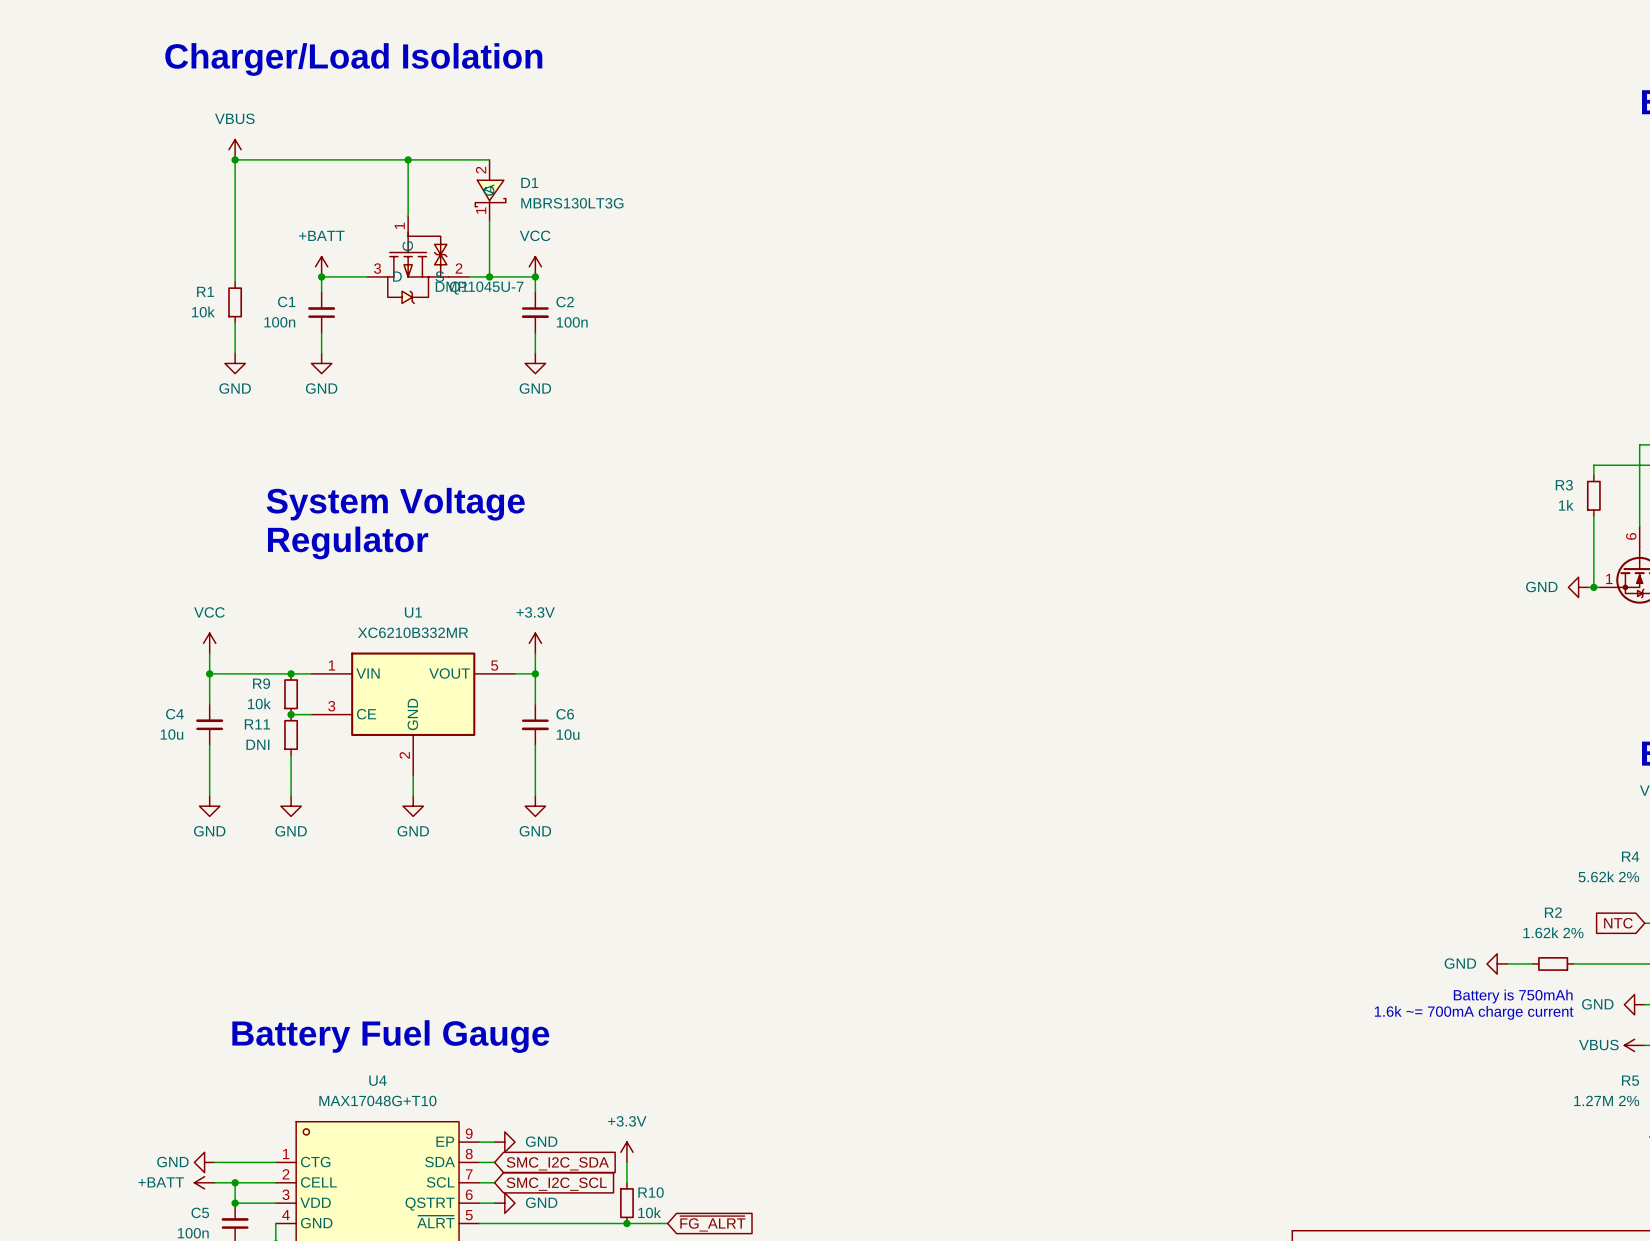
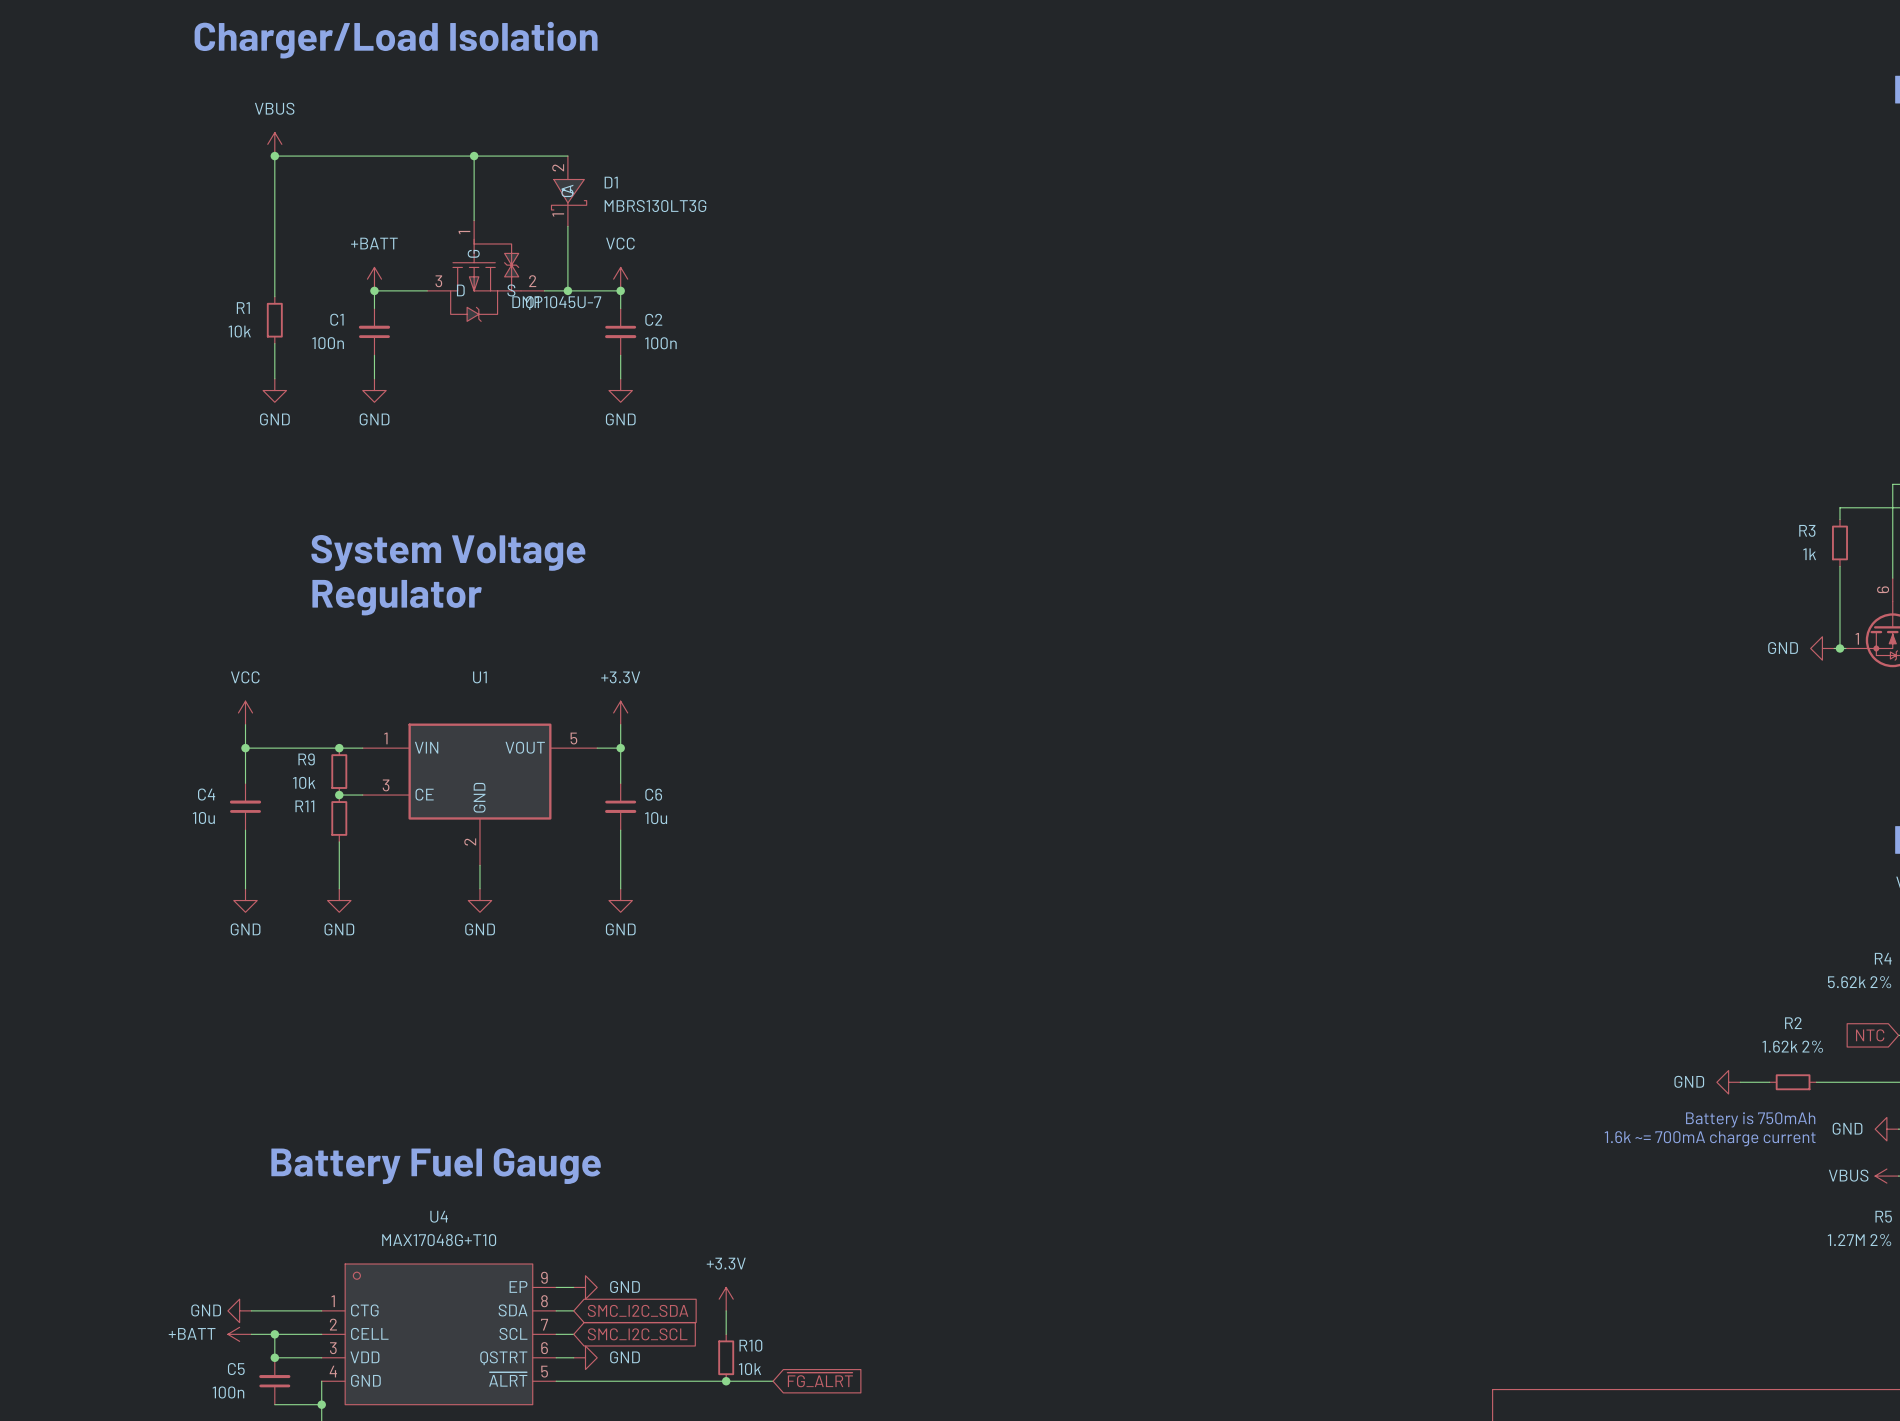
U1 value: XC6210B332MR (413, 632) -> none
R11 value: DNI (257, 744) -> none

